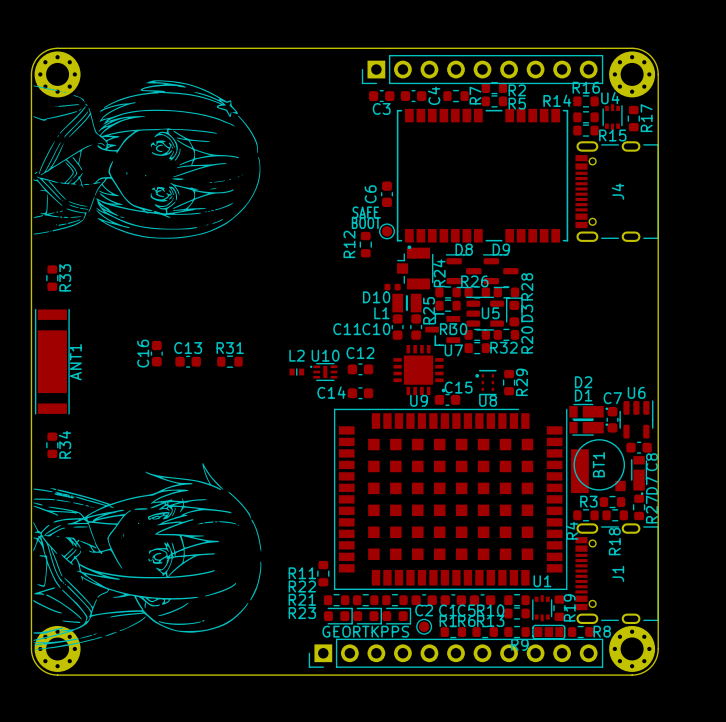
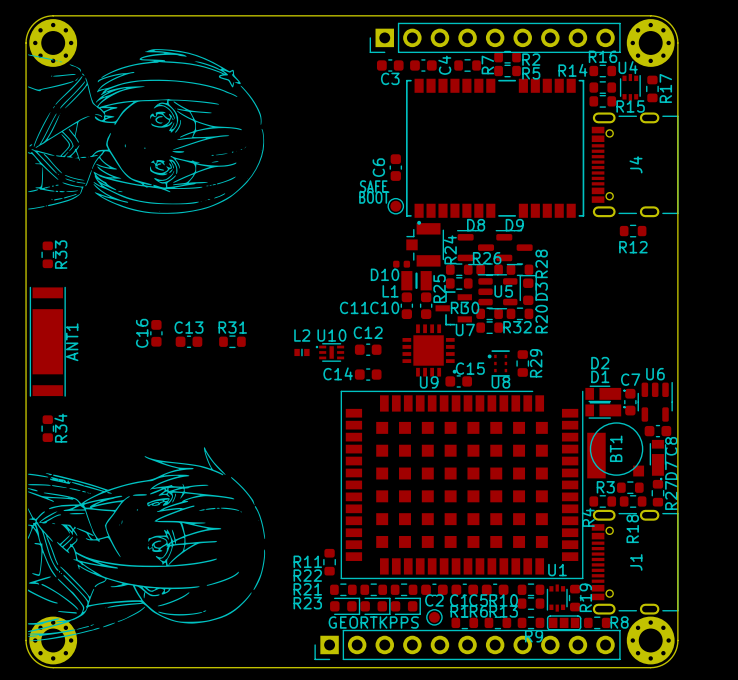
R12 name position: R12 (349, 244) -> R12 (633, 247)
R12 rotation: 0° (365, 244) -> 90° clockwise (633, 231)
R12 position: (365, 244) -> (633, 231)

